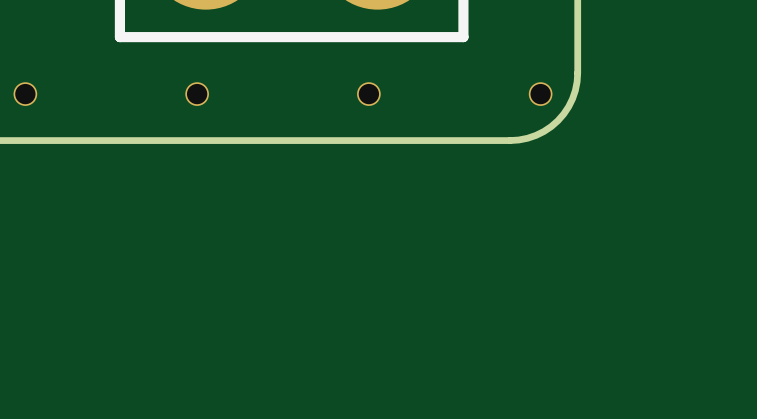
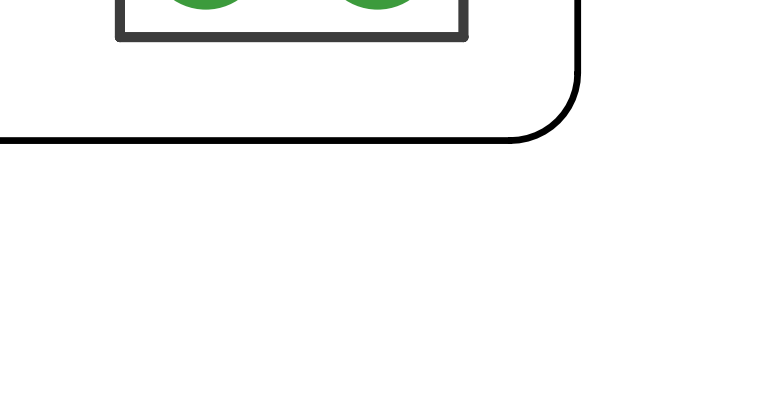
part: (25, 94) -> none
part: (197, 94) -> none
part: (368, 94) -> none
part: (540, 94) -> none

